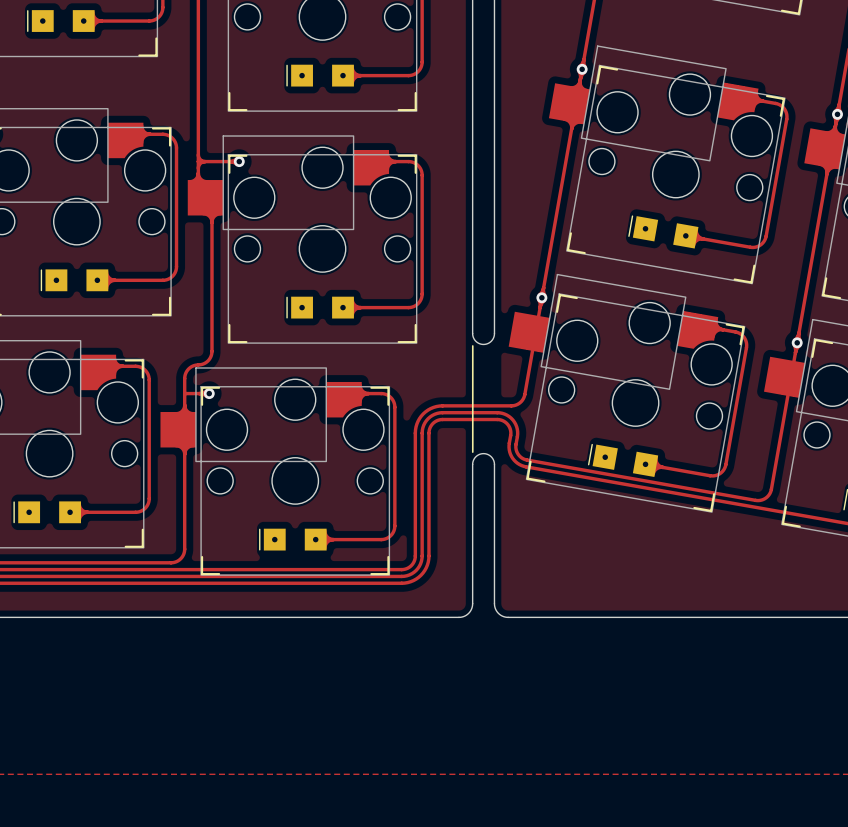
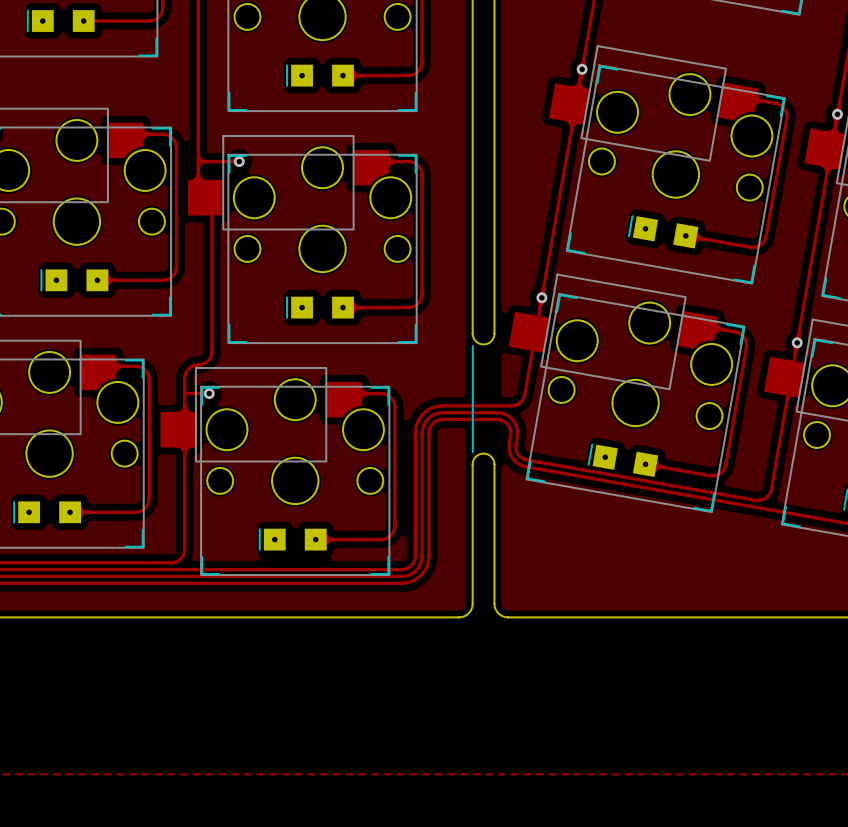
track: (92, 12) (95, 18) (101, 21) (95, 23) (92, 29) -> none
track: (203, 213) (209, 216) (211, 222) (214, 216) (220, 213) -> none

